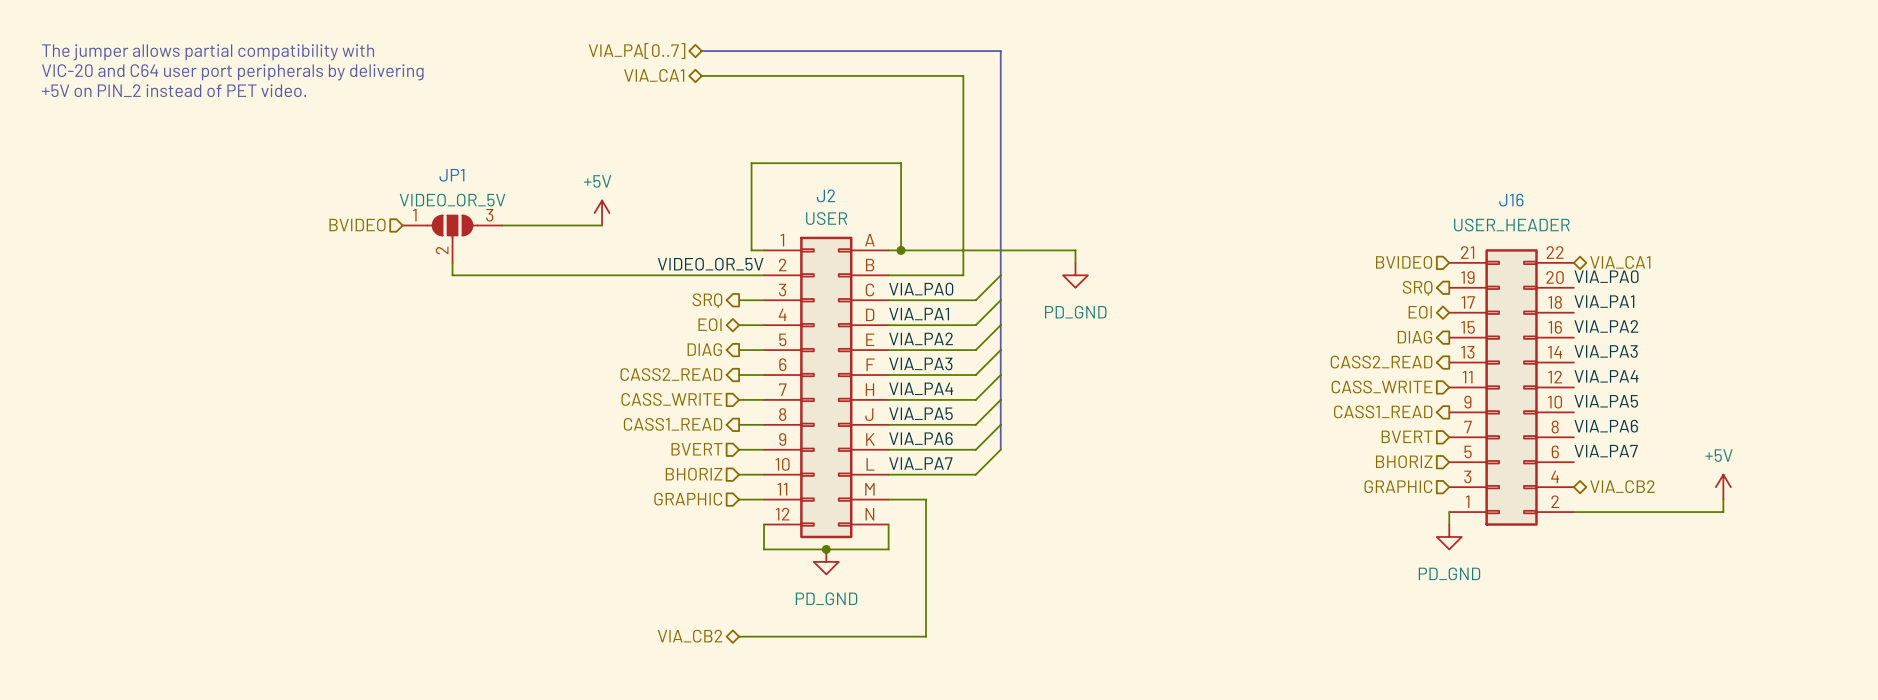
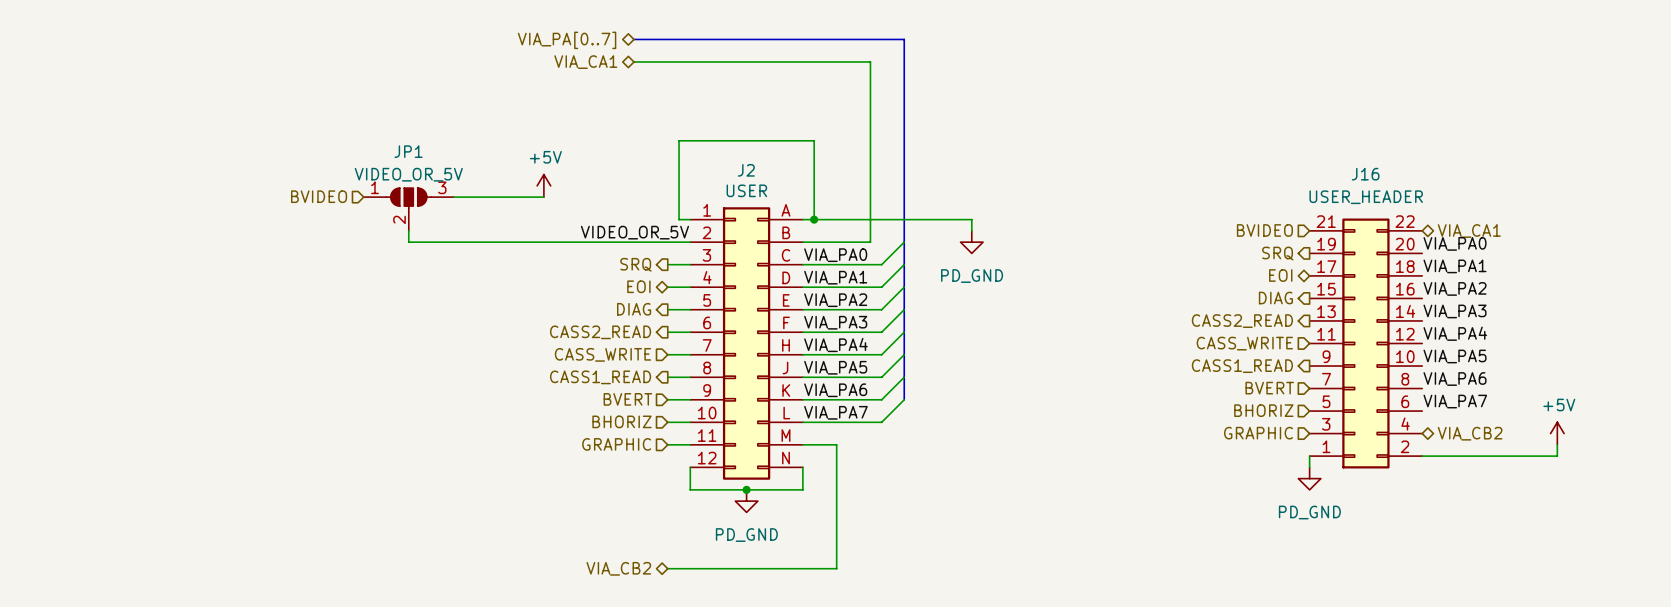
text: The jumper allows partial compatibility with (208, 52) -> none
text: VIC-20 and C64 user port peripherals by delivering (232, 72) -> none
text: +5V on PIN_2 instead of PET video. (174, 90) -> none

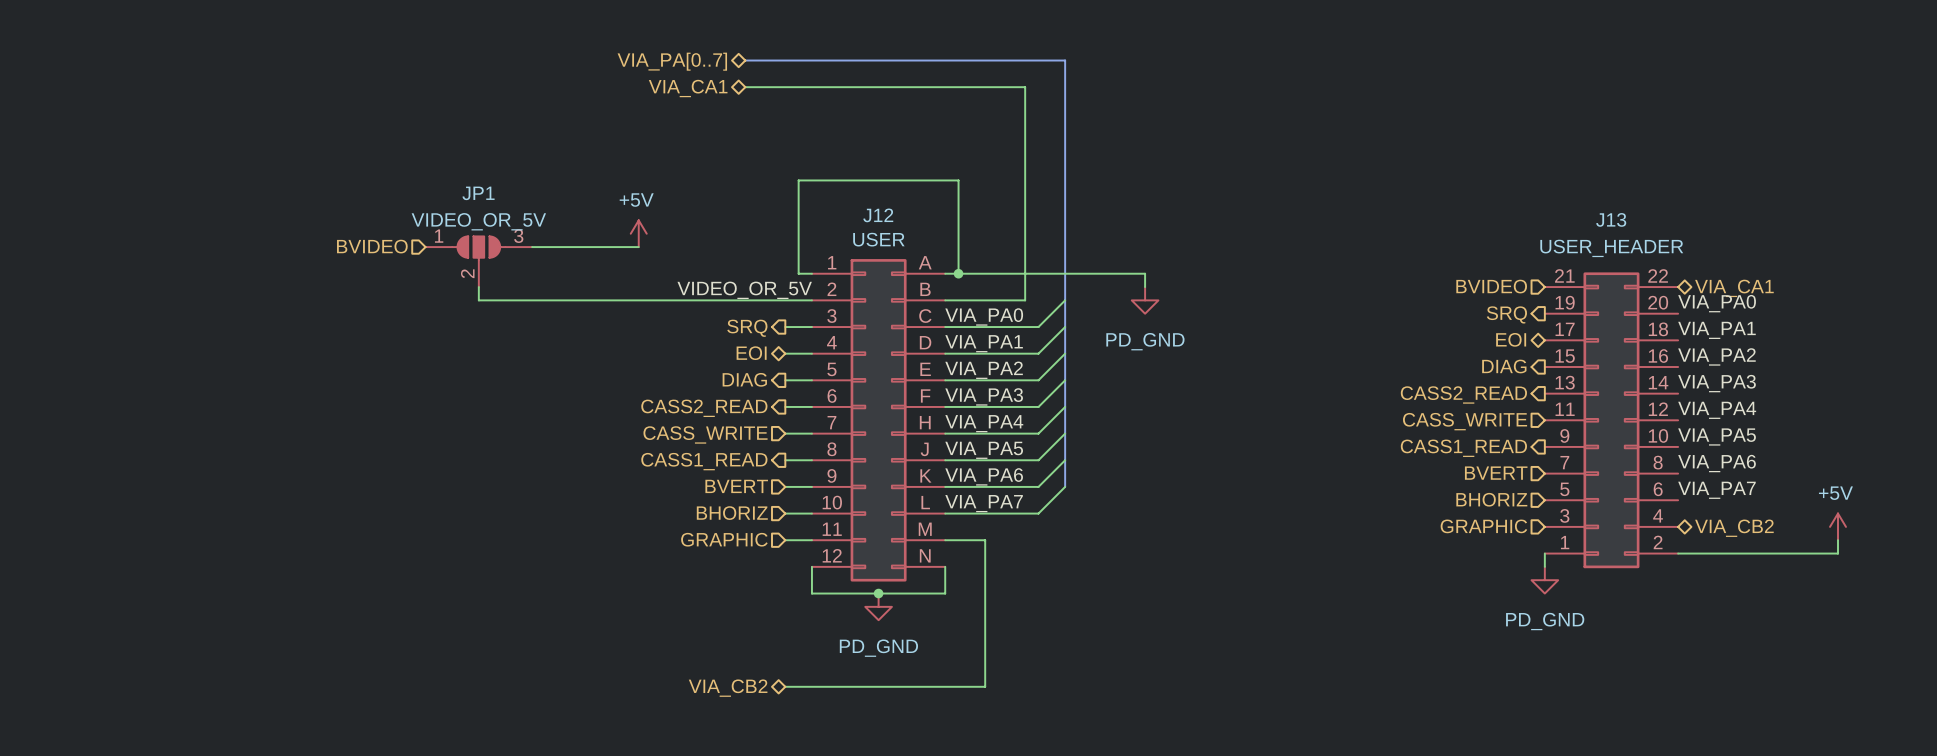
J2 name: J2 (746, 170) -> J12 (878, 215)
J16 name: J16 (1365, 174) -> J13 (1611, 219)

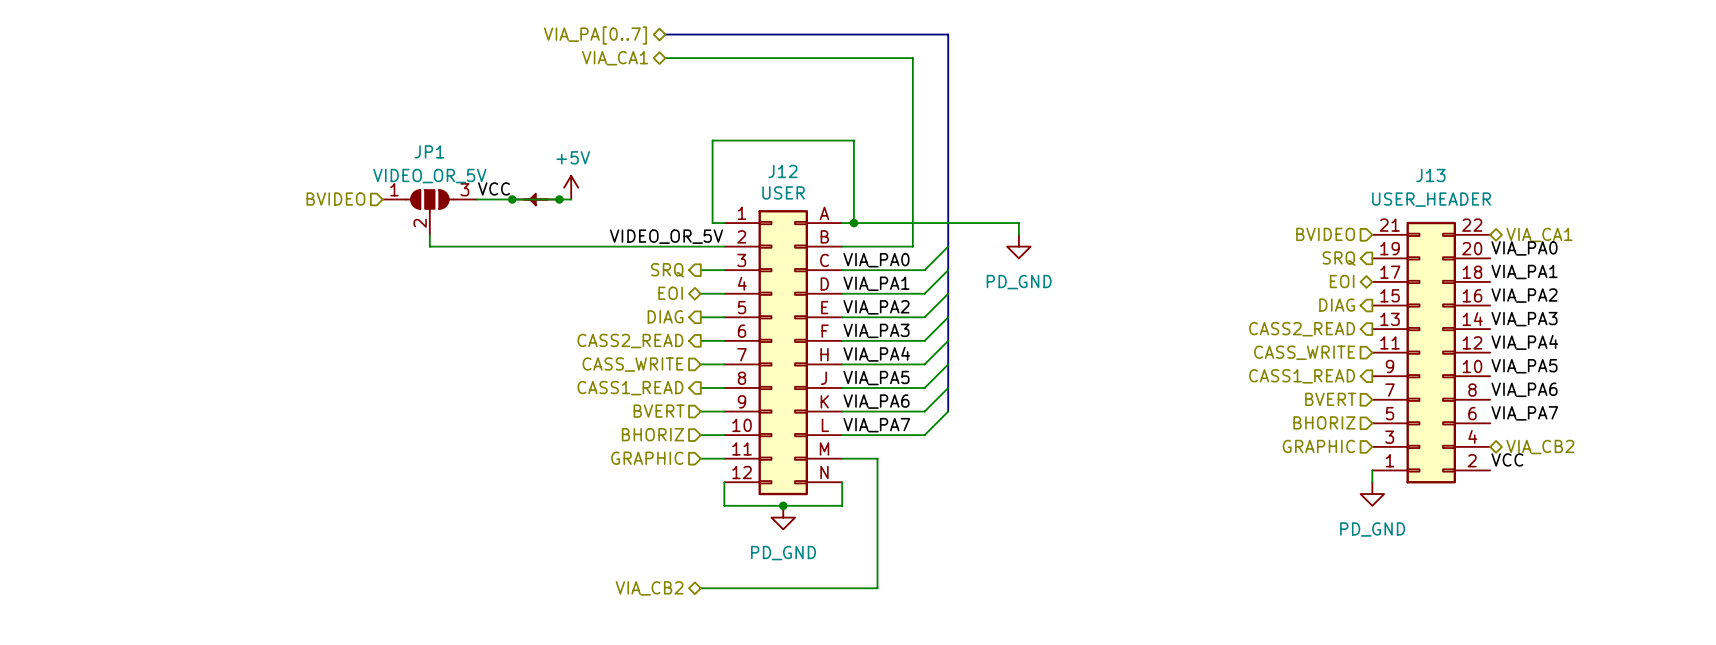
label: none -> VCC (493, 188)
junction: none -> (512, 199)
part: none -> (535, 199)
junction: none -> (559, 199)
power symbol: +5V (1838, 526) -> none
wire: (1838, 540) (1838, 553) (1678, 553) -> none
label: none -> VCC (1507, 459)

